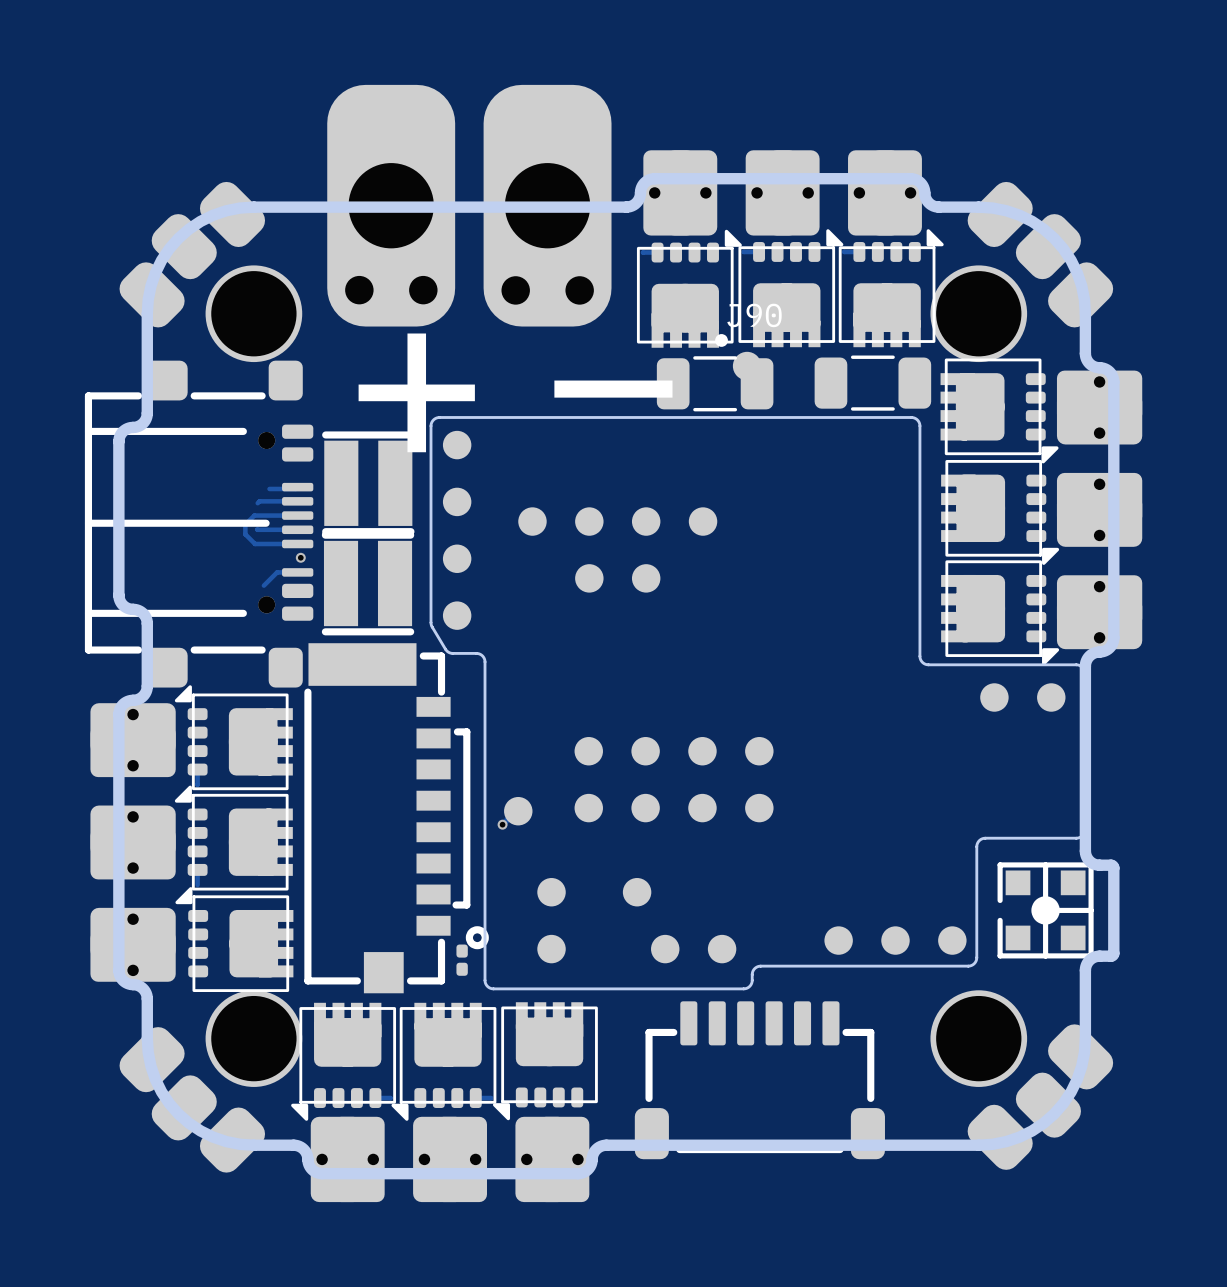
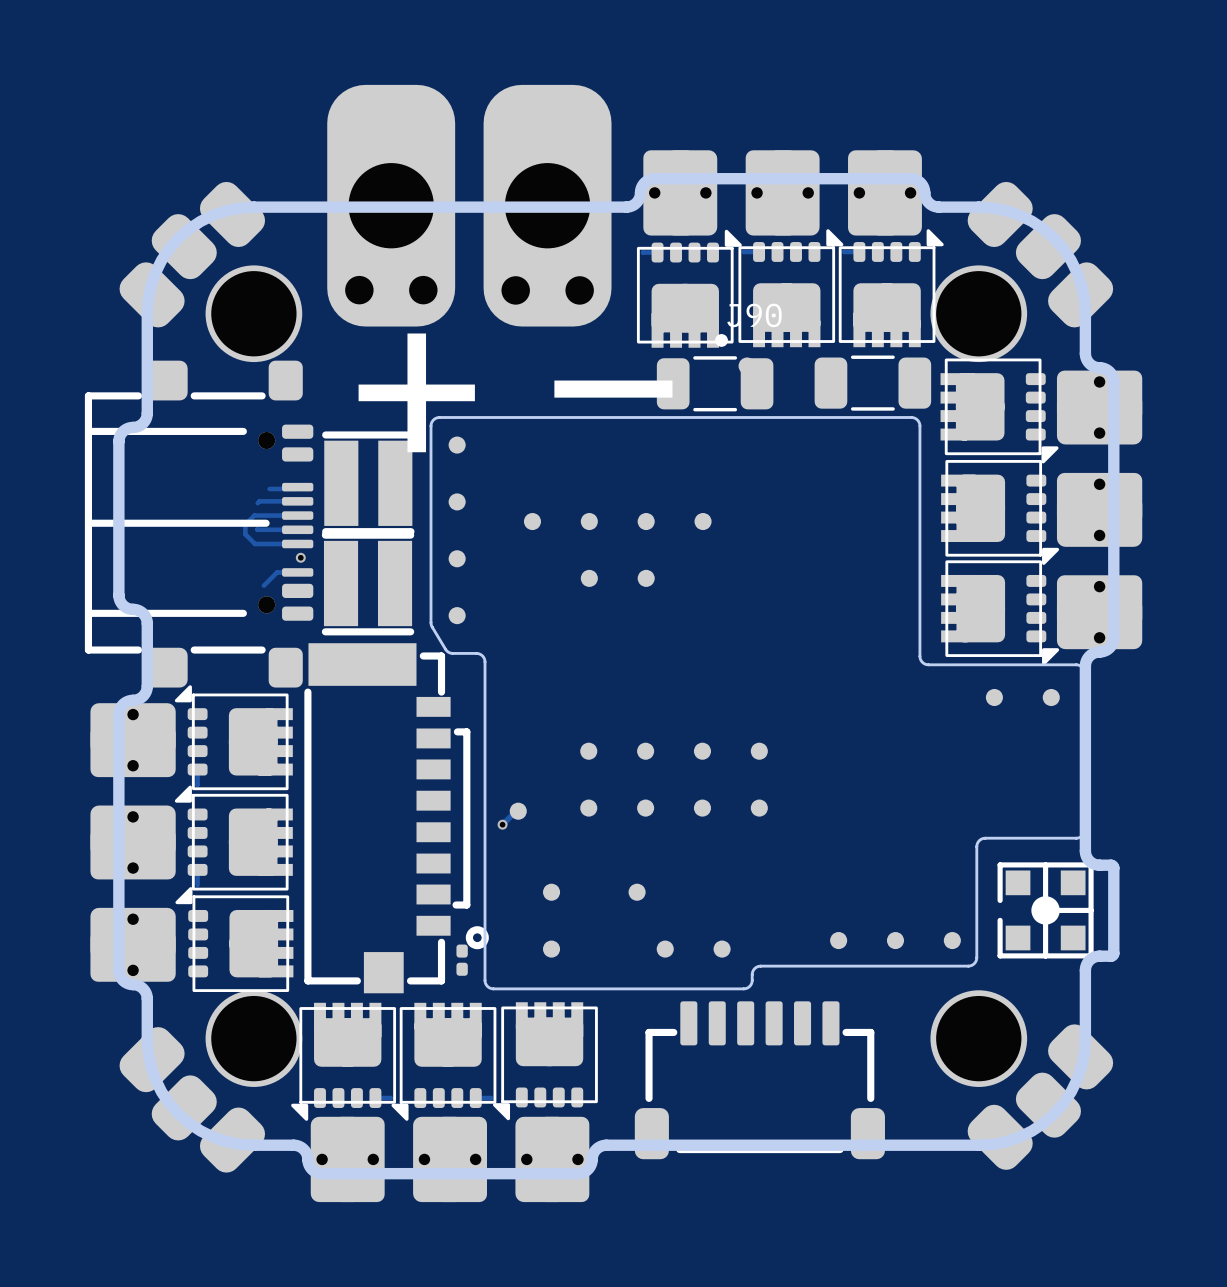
part footprint: [442, 334, 1066, 964] -> [448, 334, 1060, 958]

